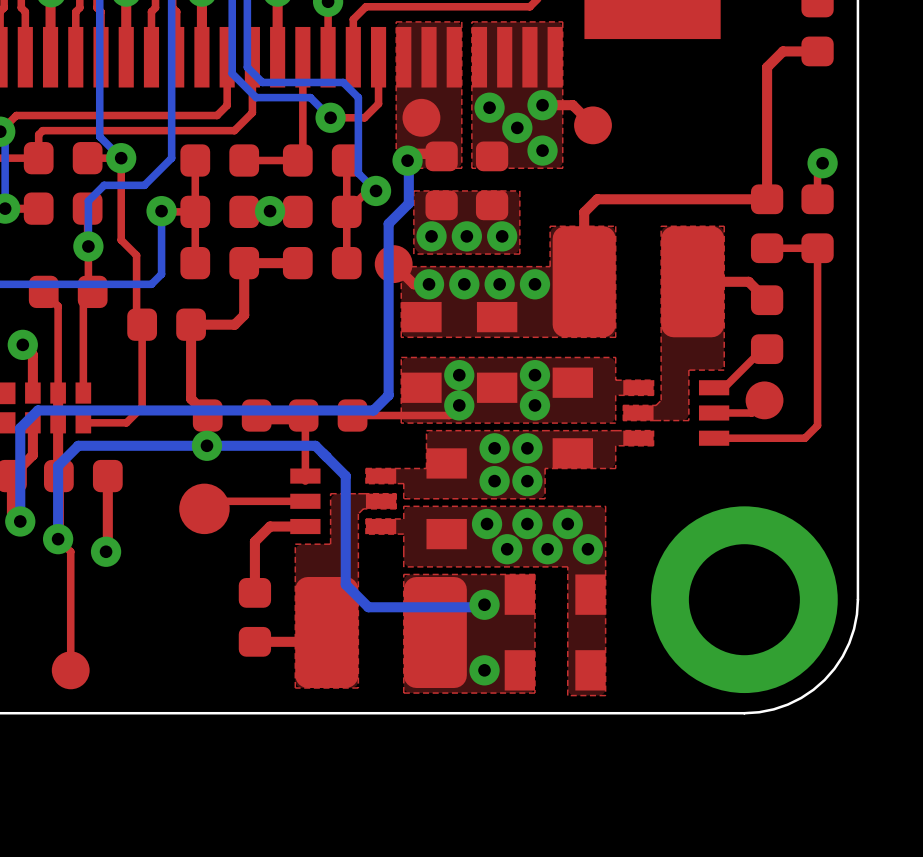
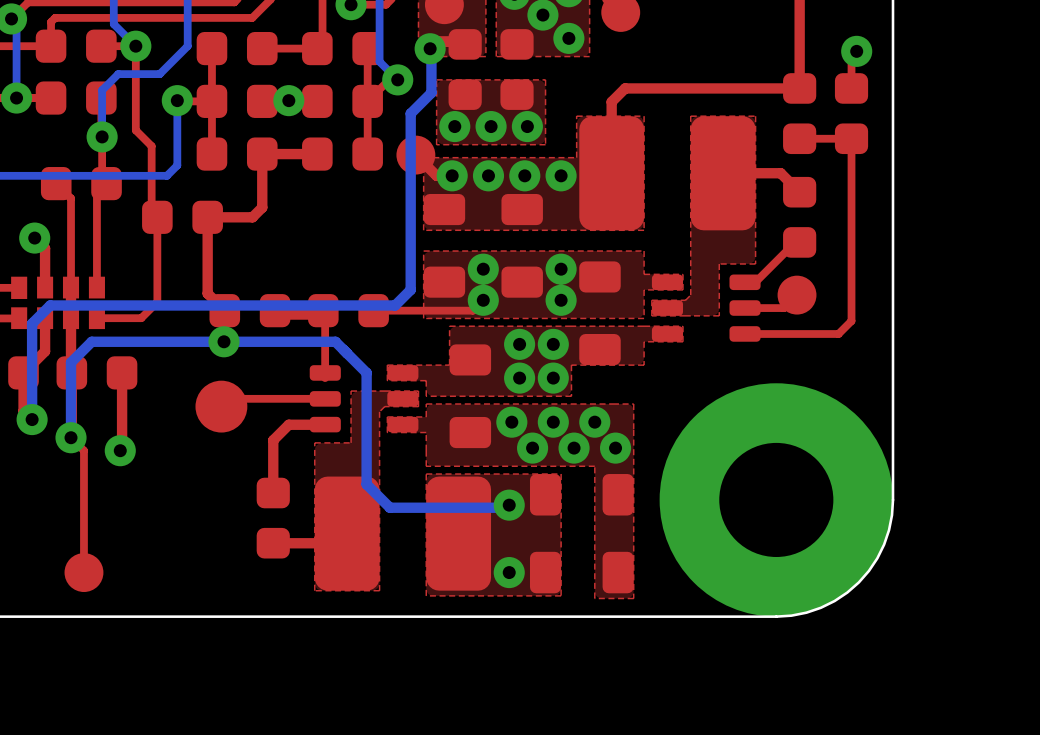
part footprint: [401, 301, 442, 403] -> [423, 193, 466, 298]
part footprint: [476, 301, 518, 403] -> [501, 193, 543, 298]
part footprint: [552, 367, 594, 469] -> [579, 261, 621, 366]
part footprint: [623, 380, 730, 446] -> [651, 274, 761, 342]
part footprint: [426, 448, 467, 550] -> [449, 344, 492, 449]
part footprint: [290, 468, 397, 535] -> [309, 365, 419, 433]
part footprint: [651, 506, 838, 694] -> [659, 383, 894, 617]
part footprint: [504, 574, 606, 615] -> [529, 474, 634, 516]
part footprint: [504, 650, 606, 691] -> [529, 551, 634, 594]

